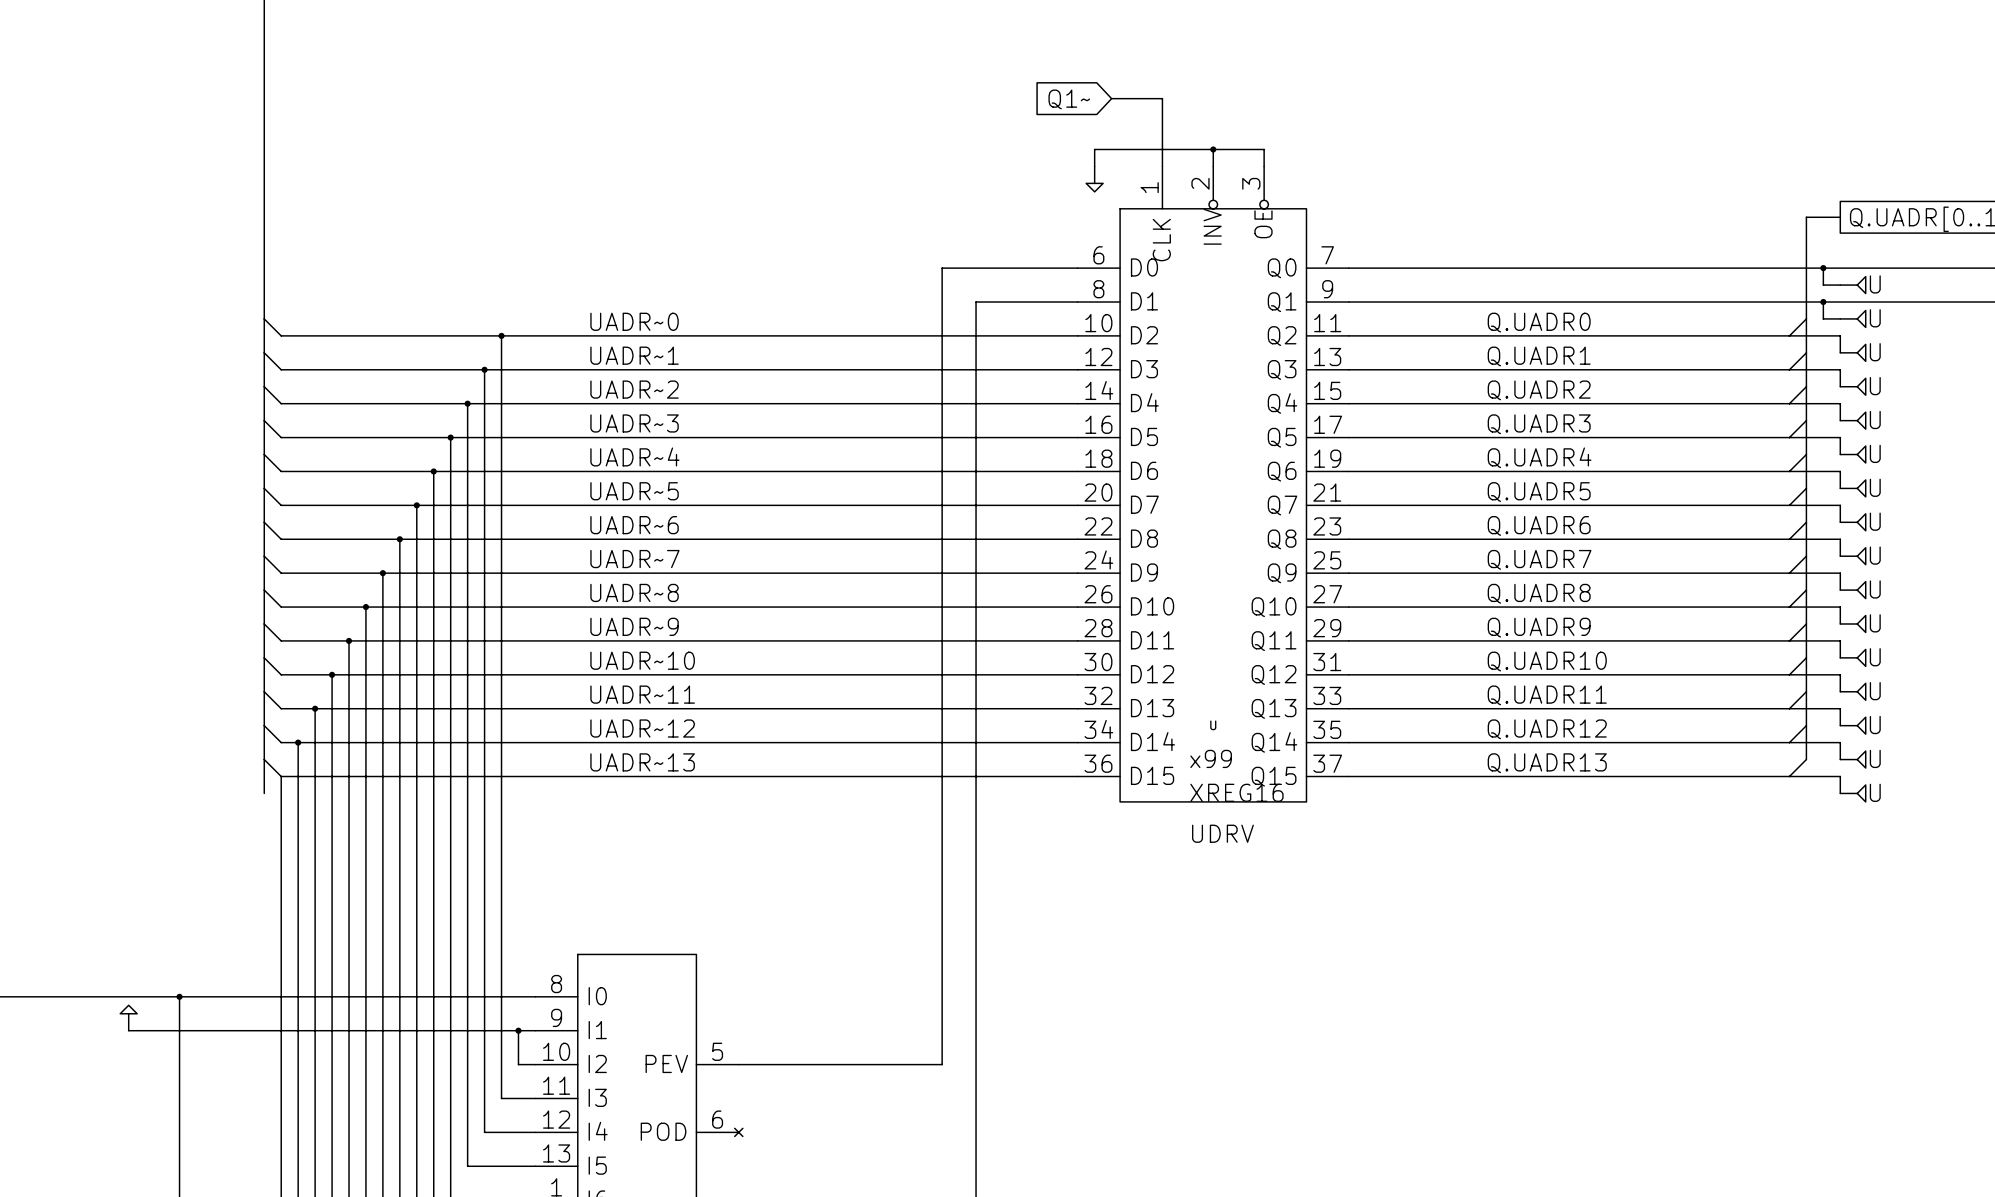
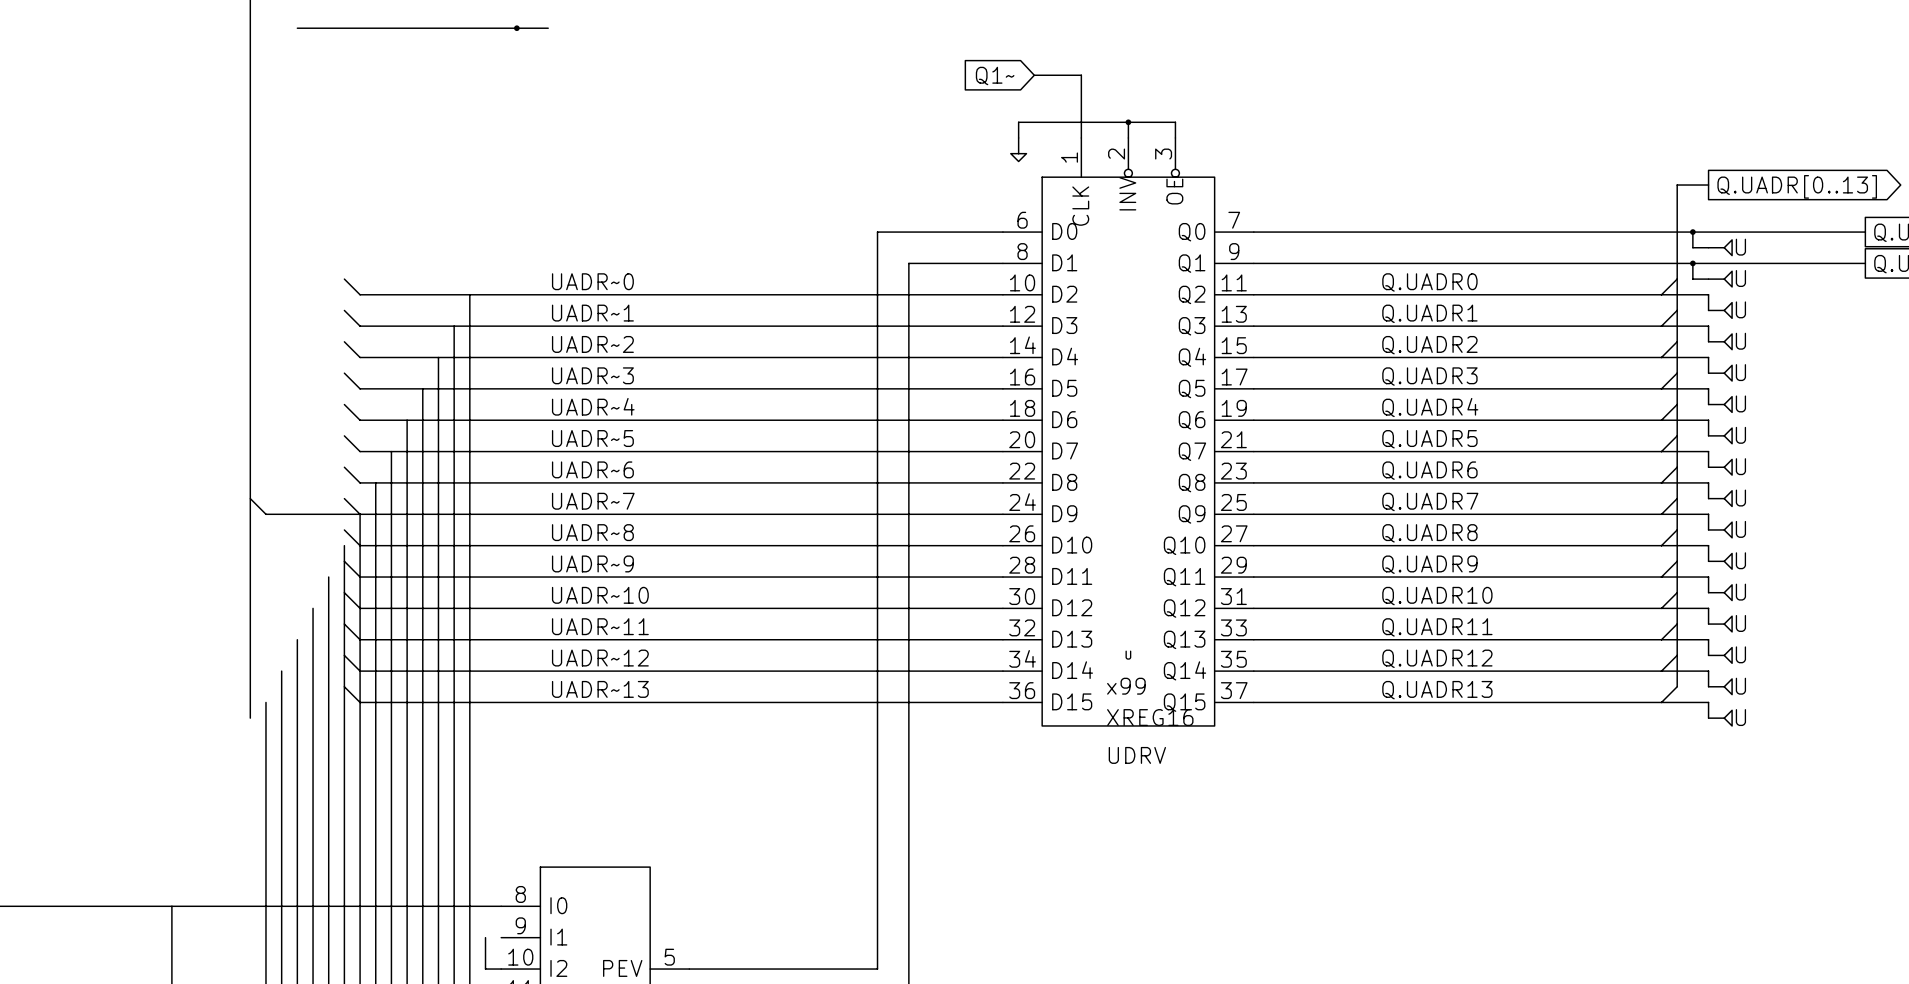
wire: none -> (297, 28) (548, 28)
junction: none -> (516, 28)
wire: (264, 318) (281, 335) (382, 335) -> (344, 279) (360, 294)
junction: (501, 335) -> none
wire: (264, 352) (281, 369) (382, 369) -> (344, 310) (360, 326)
junction: (484, 369) -> none
wire: (264, 386) (281, 403) (382, 403) -> (344, 341) (360, 357)
junction: (467, 403) -> none
wire: (264, 420) (281, 437) (382, 437) -> (344, 373) (360, 388)
junction: (450, 437) -> none
wire: (264, 454) (281, 471) (382, 471) -> (344, 404) (360, 420)
junction: (433, 471) -> none
wire: (264, 488) (281, 505) (382, 505) -> (344, 435) (360, 451)
junction: (416, 505) -> none
wire: (264, 522) (281, 539) (382, 539) -> (344, 467) (360, 482)
junction: (399, 539) -> none
wire: none -> (344, 498) (360, 514)
junction: (382, 573) -> none
wire: (264, 590) (281, 607) (382, 607) -> (344, 529) (360, 545)
junction: (365, 607) -> none
wire: (264, 623) (281, 640) (382, 640) -> (344, 561) (360, 577)
junction: (349, 640) -> none
wire: (264, 657) (281, 674) (382, 674) -> (344, 592) (360, 608)
junction: (332, 674) -> none
wire: (264, 691) (281, 708) (382, 708) -> (344, 624) (360, 639)
junction: (315, 708) -> none
wire: (264, 725) (281, 742) (382, 742) -> (344, 655) (360, 671)
junction: (298, 742) -> none
wire: (264, 759) (281, 776) (382, 776) -> (344, 686) (360, 702)
junction: (179, 996) -> none
power symbol: (128, 1017) -> none
wire: (128, 1030) (535, 1030) -> none
junction: (518, 1030) -> none

